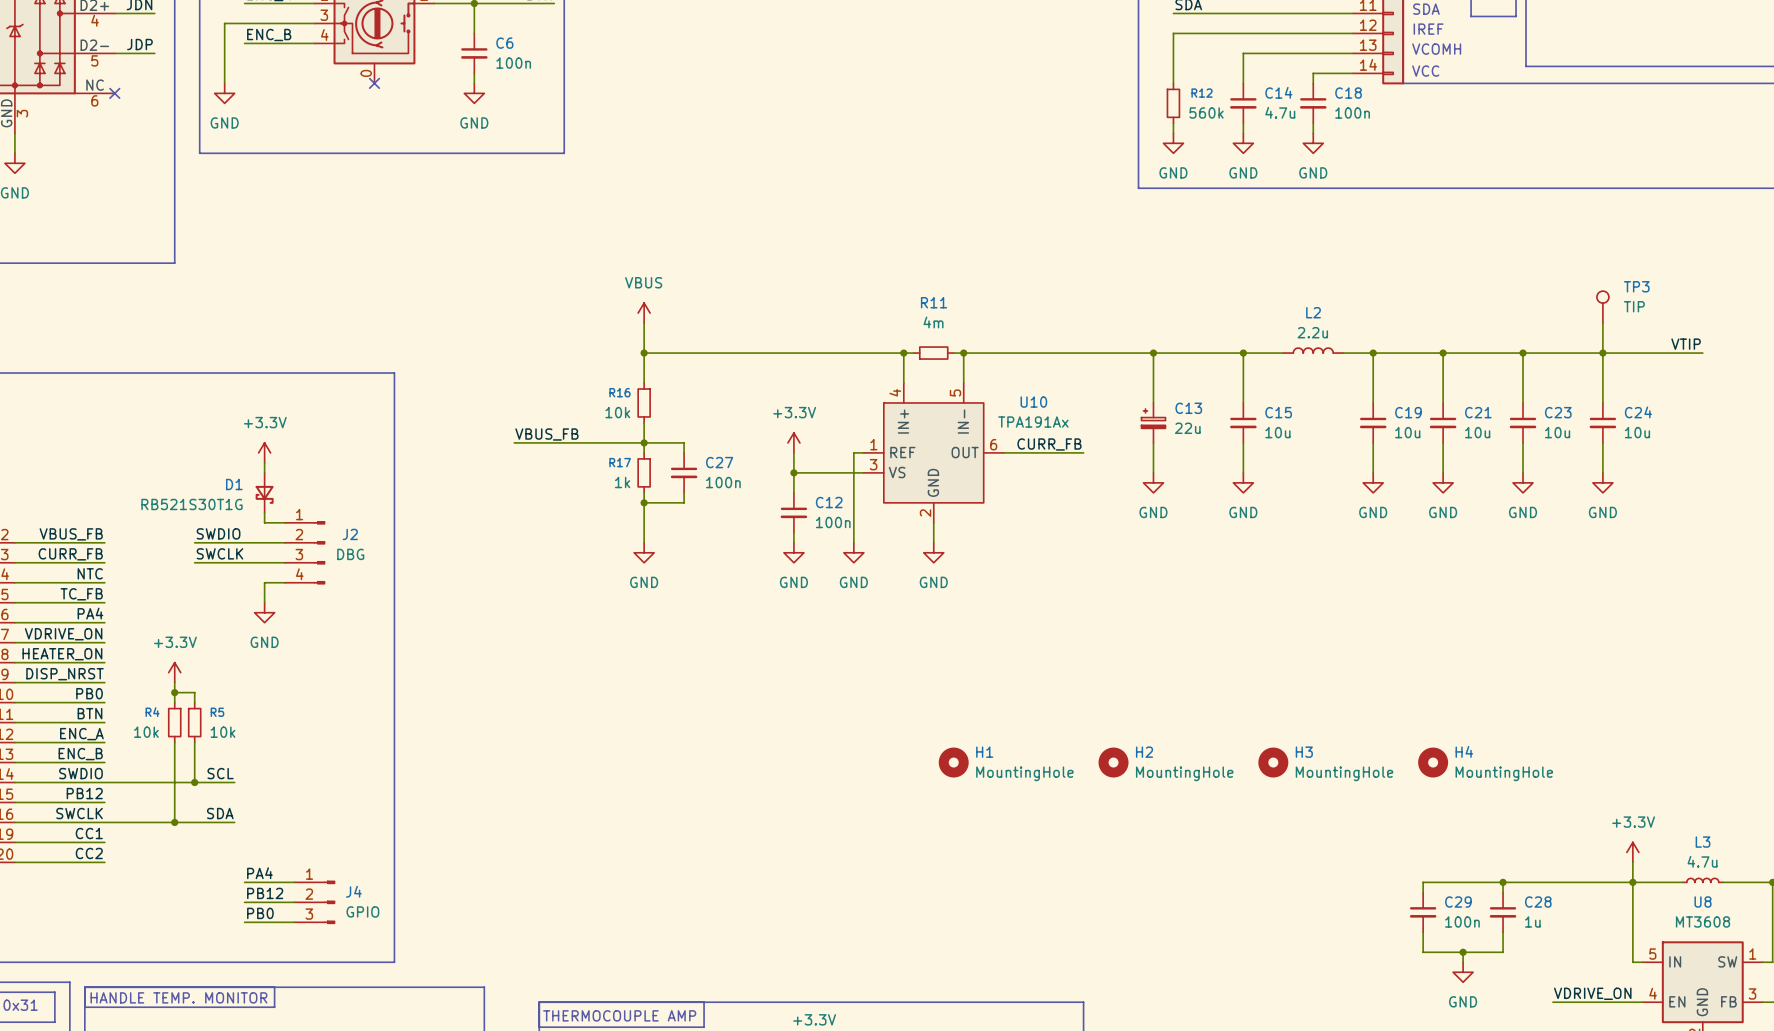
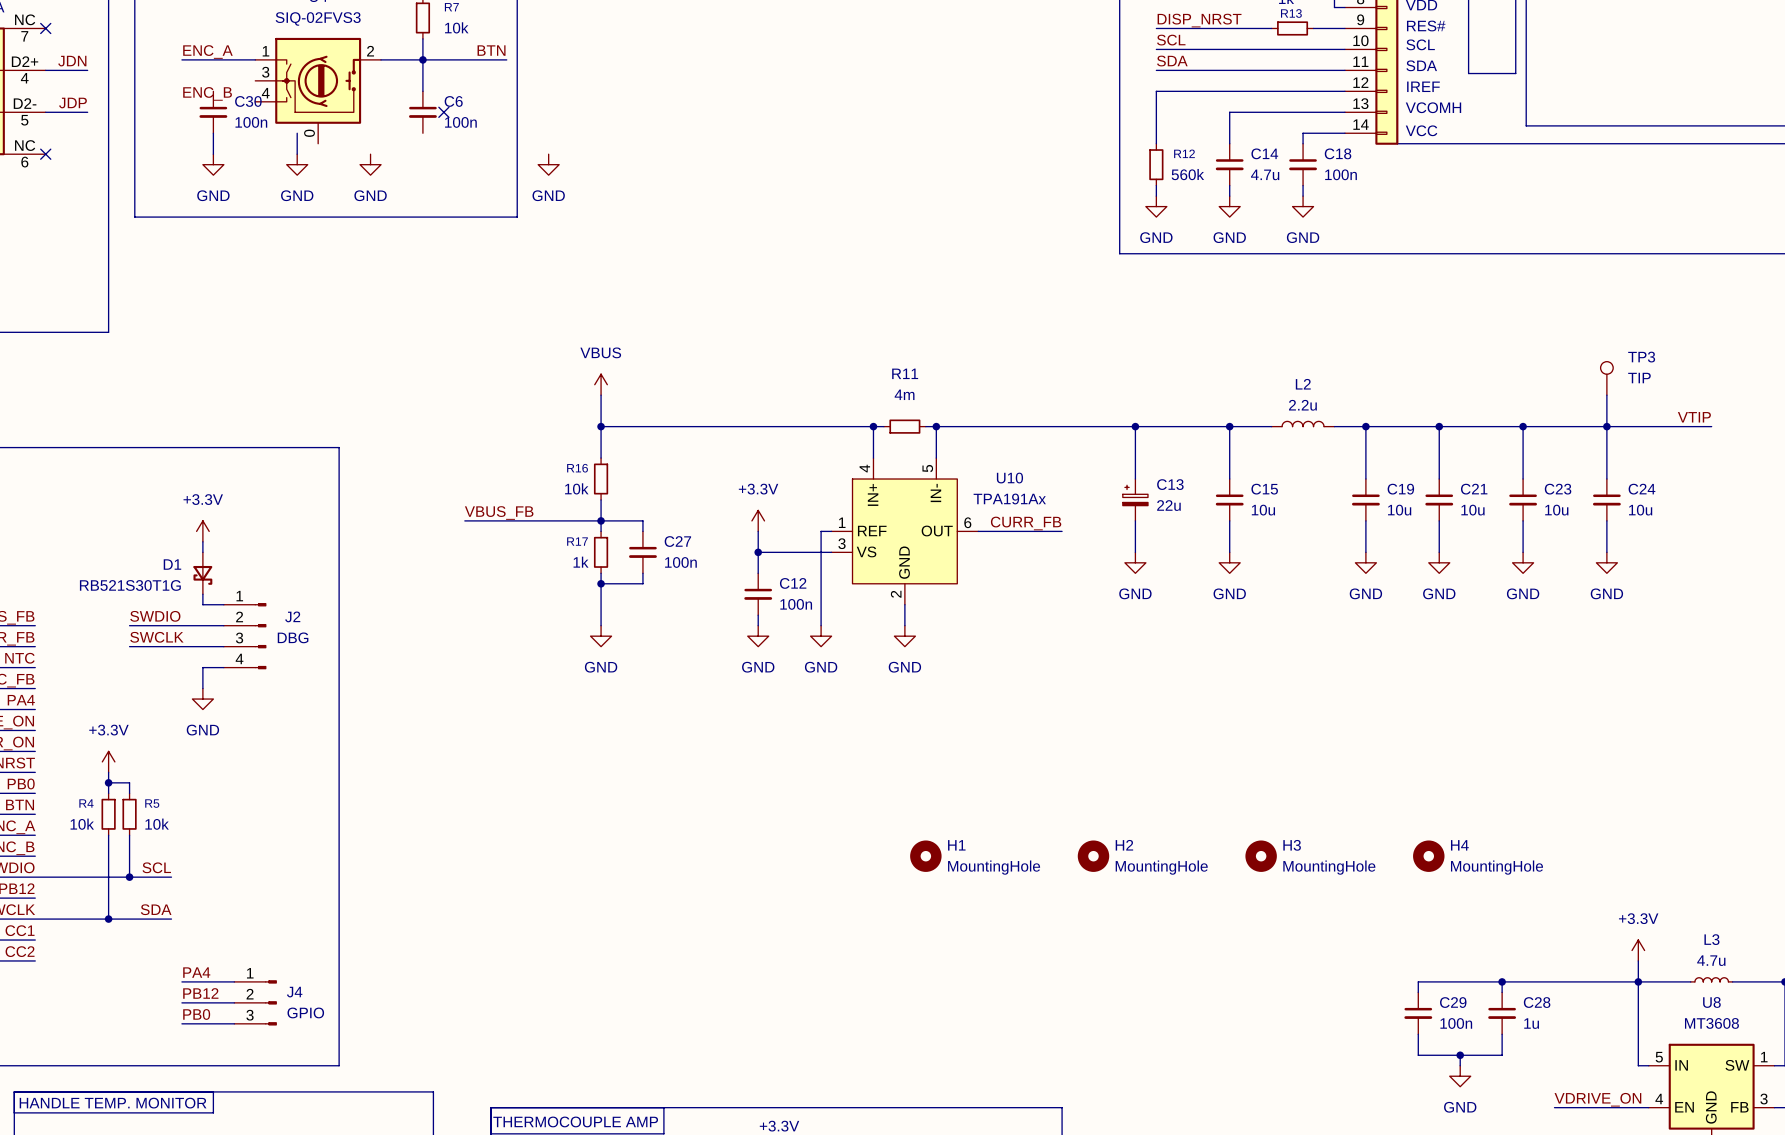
wire: (314, 23) (224, 23) (224, 83) -> none
wire: (244, 43) (314, 43) -> none
C30: none -> 100n (213, 112)
no-connect mark: none -> (443, 112)
wire: none -> (213, 133) (213, 154)
wire: none -> (297, 133) (297, 154)
wire: (474, 73) (474, 83) -> none
no-connect mark: (374, 83) -> none
power symbol position: GND (224, 93) -> GND (213, 164)
power symbol position: GND (474, 93) -> GND (370, 164)
power symbol: none -> GND (297, 164)
power symbol: none -> GND (548, 164)

